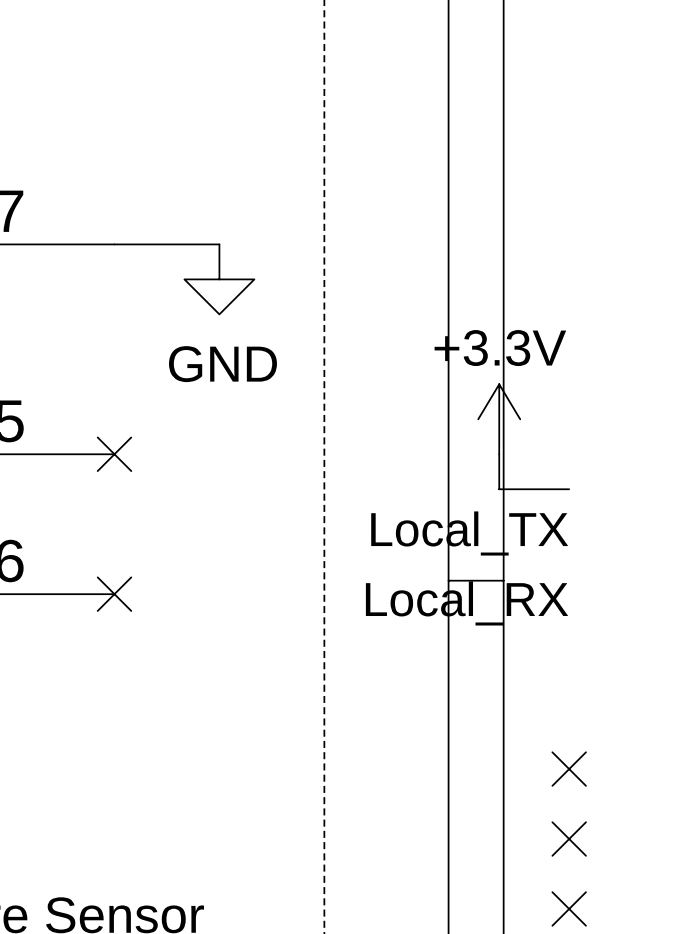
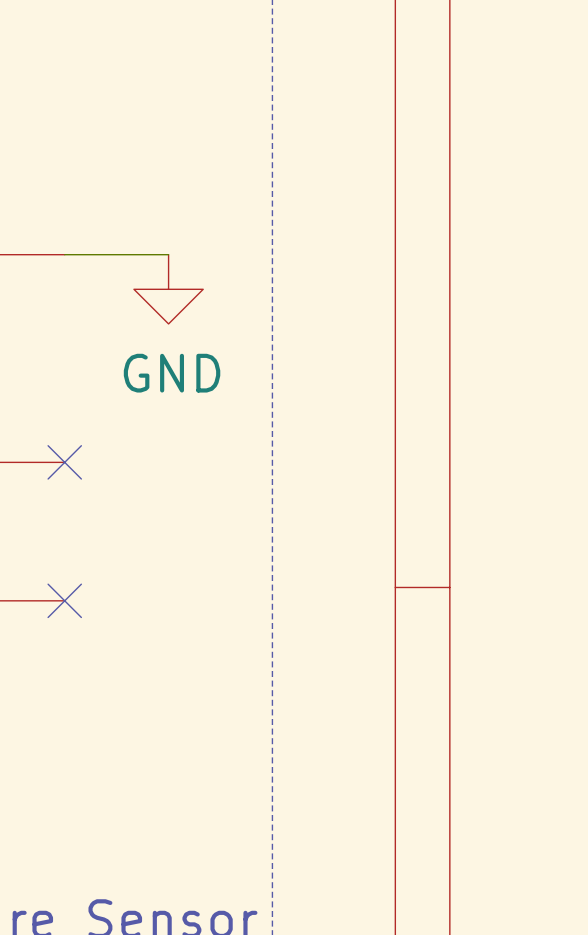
power symbol: +3.3V (499, 419) -> none
wire: (499, 454) (499, 489) (569, 489) -> none
label: Local_TX (469, 533) -> none
label: Local_RX (467, 603) -> none
no-connect mark: (569, 769) -> none
no-connect mark: (569, 839) -> none
no-connect mark: (569, 908) -> none

